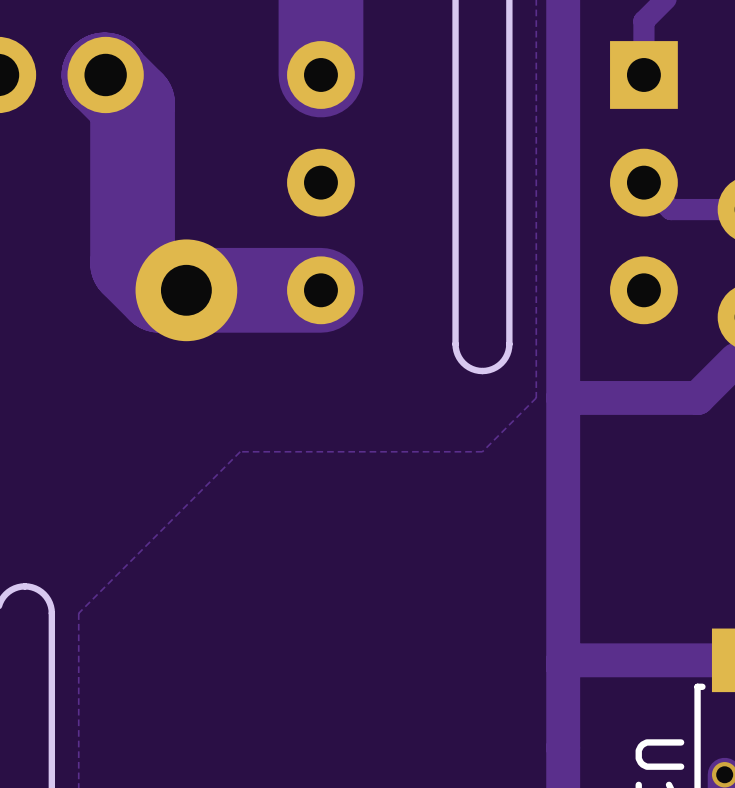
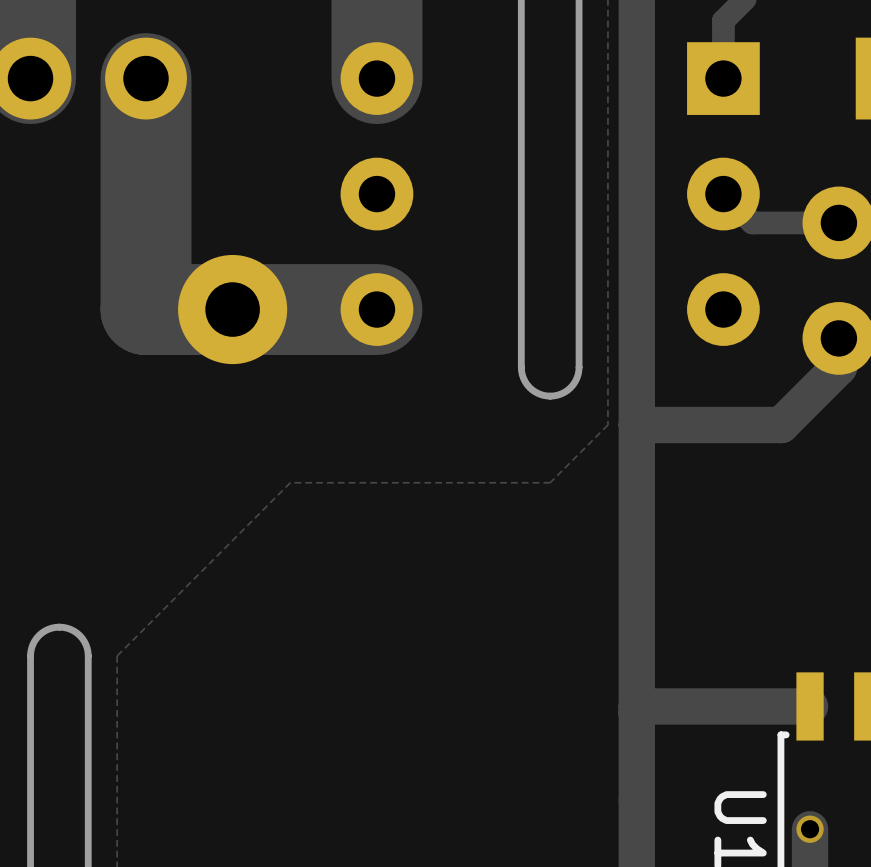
track: (105, 74) (103, 74) (132, 103) (132, 263) (159, 290) -> (146, 78) (146, 309) (203, 309)

